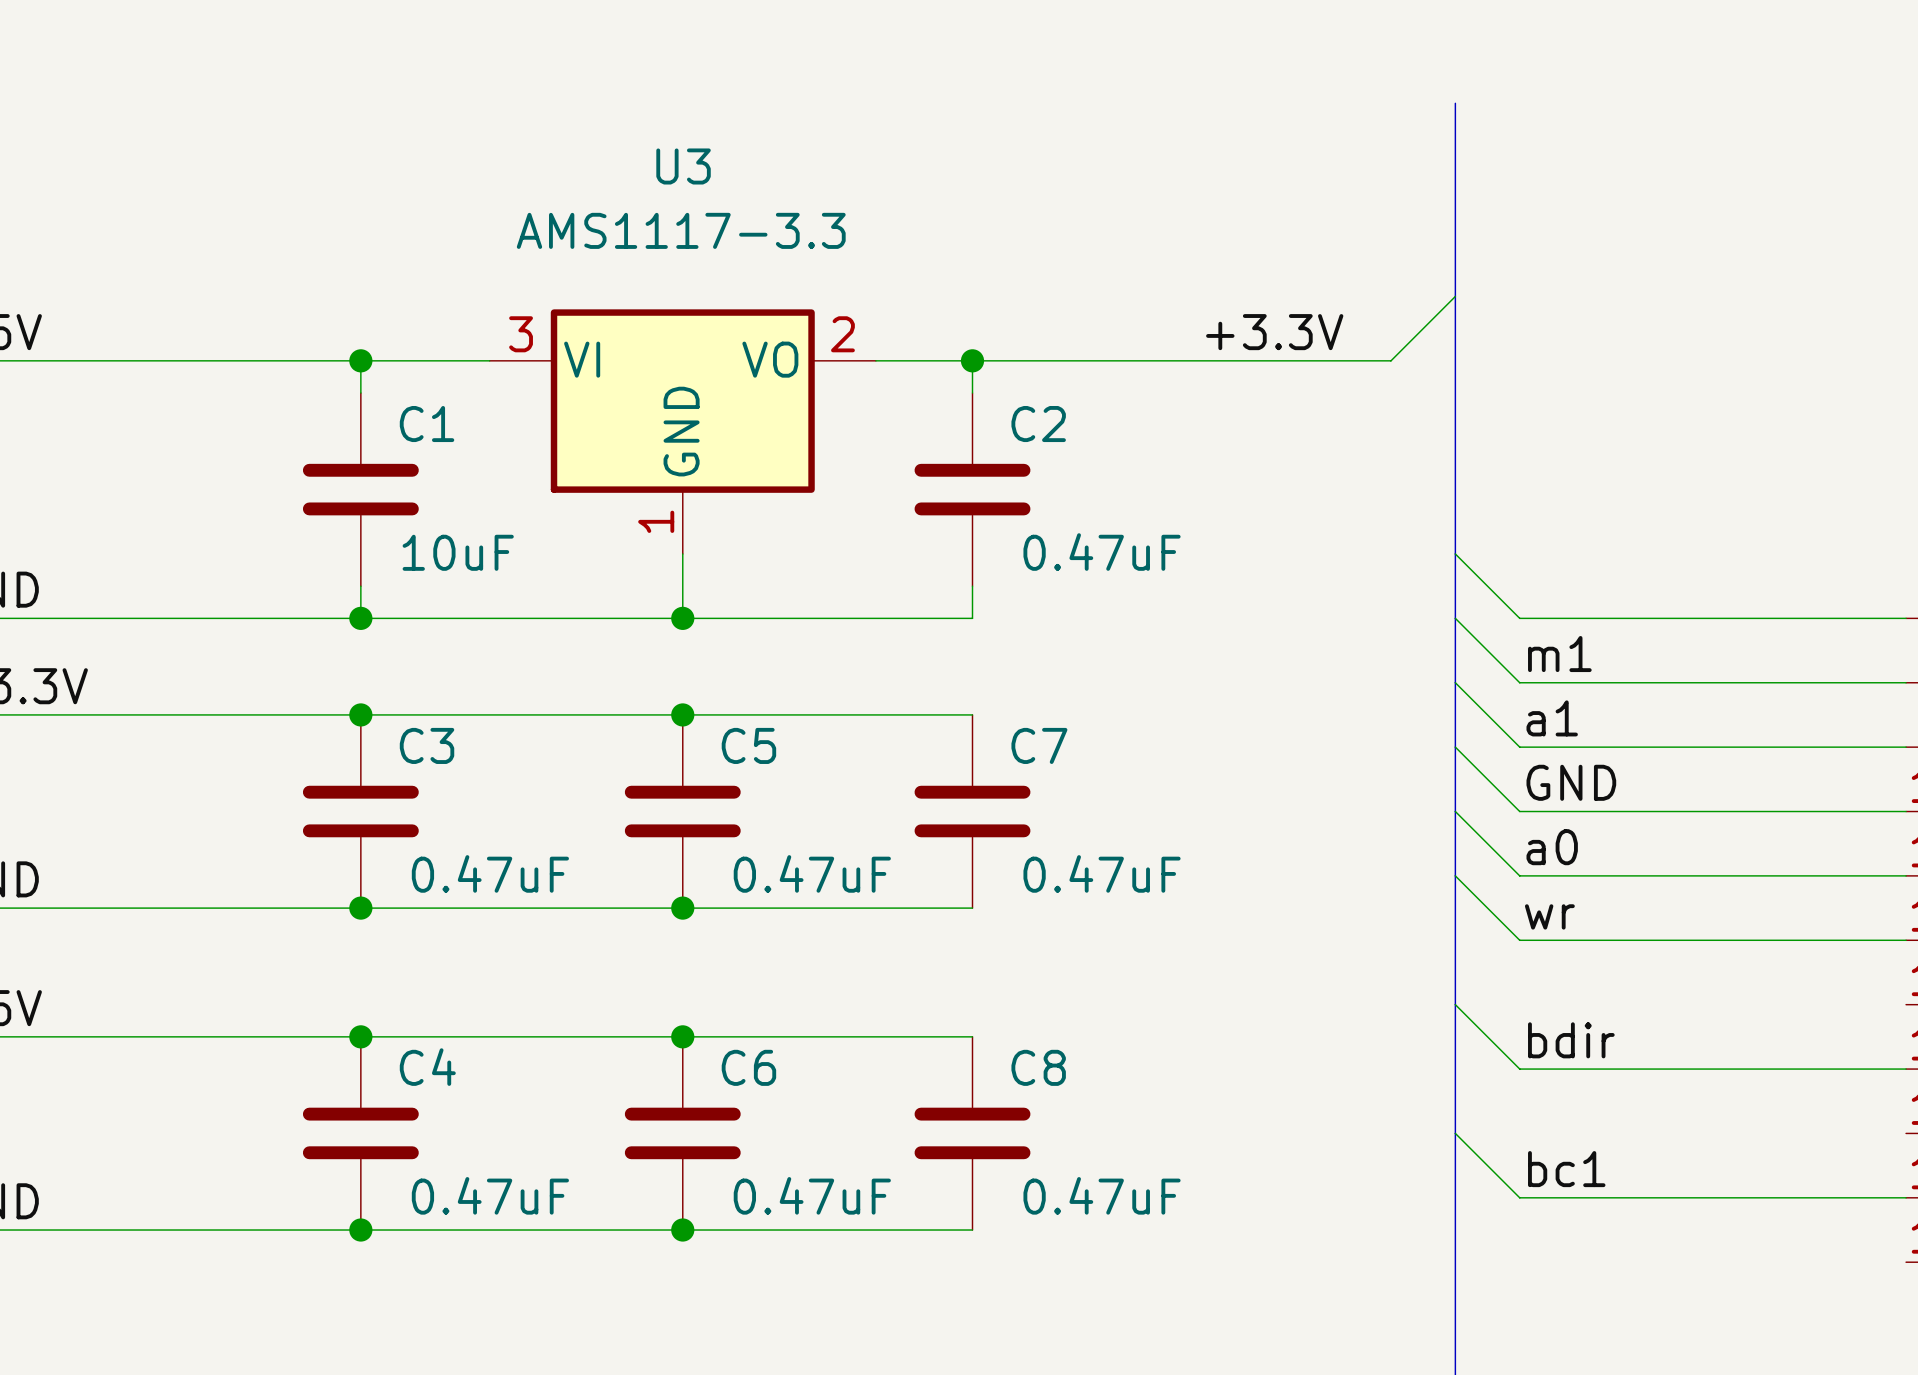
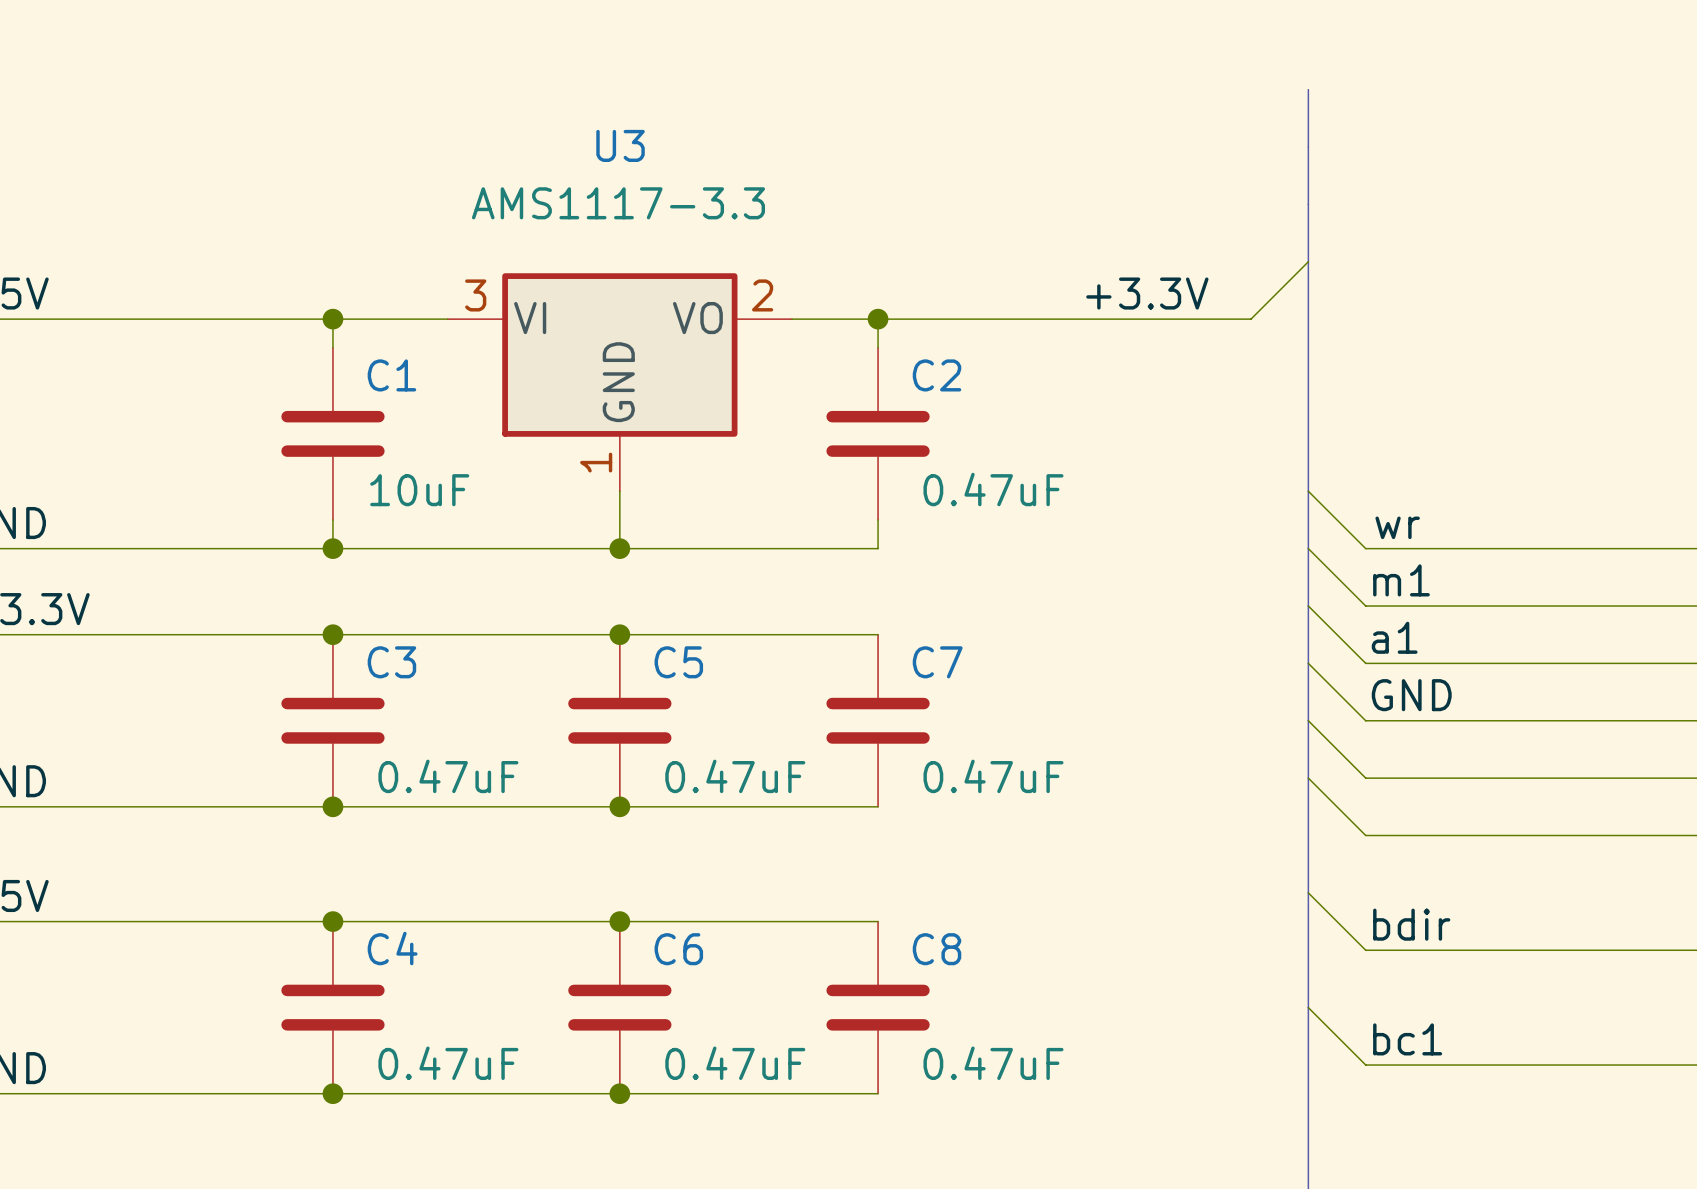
label: a0 (1552, 847) -> none
label position: wr (1549, 916) -> wr (1397, 527)

